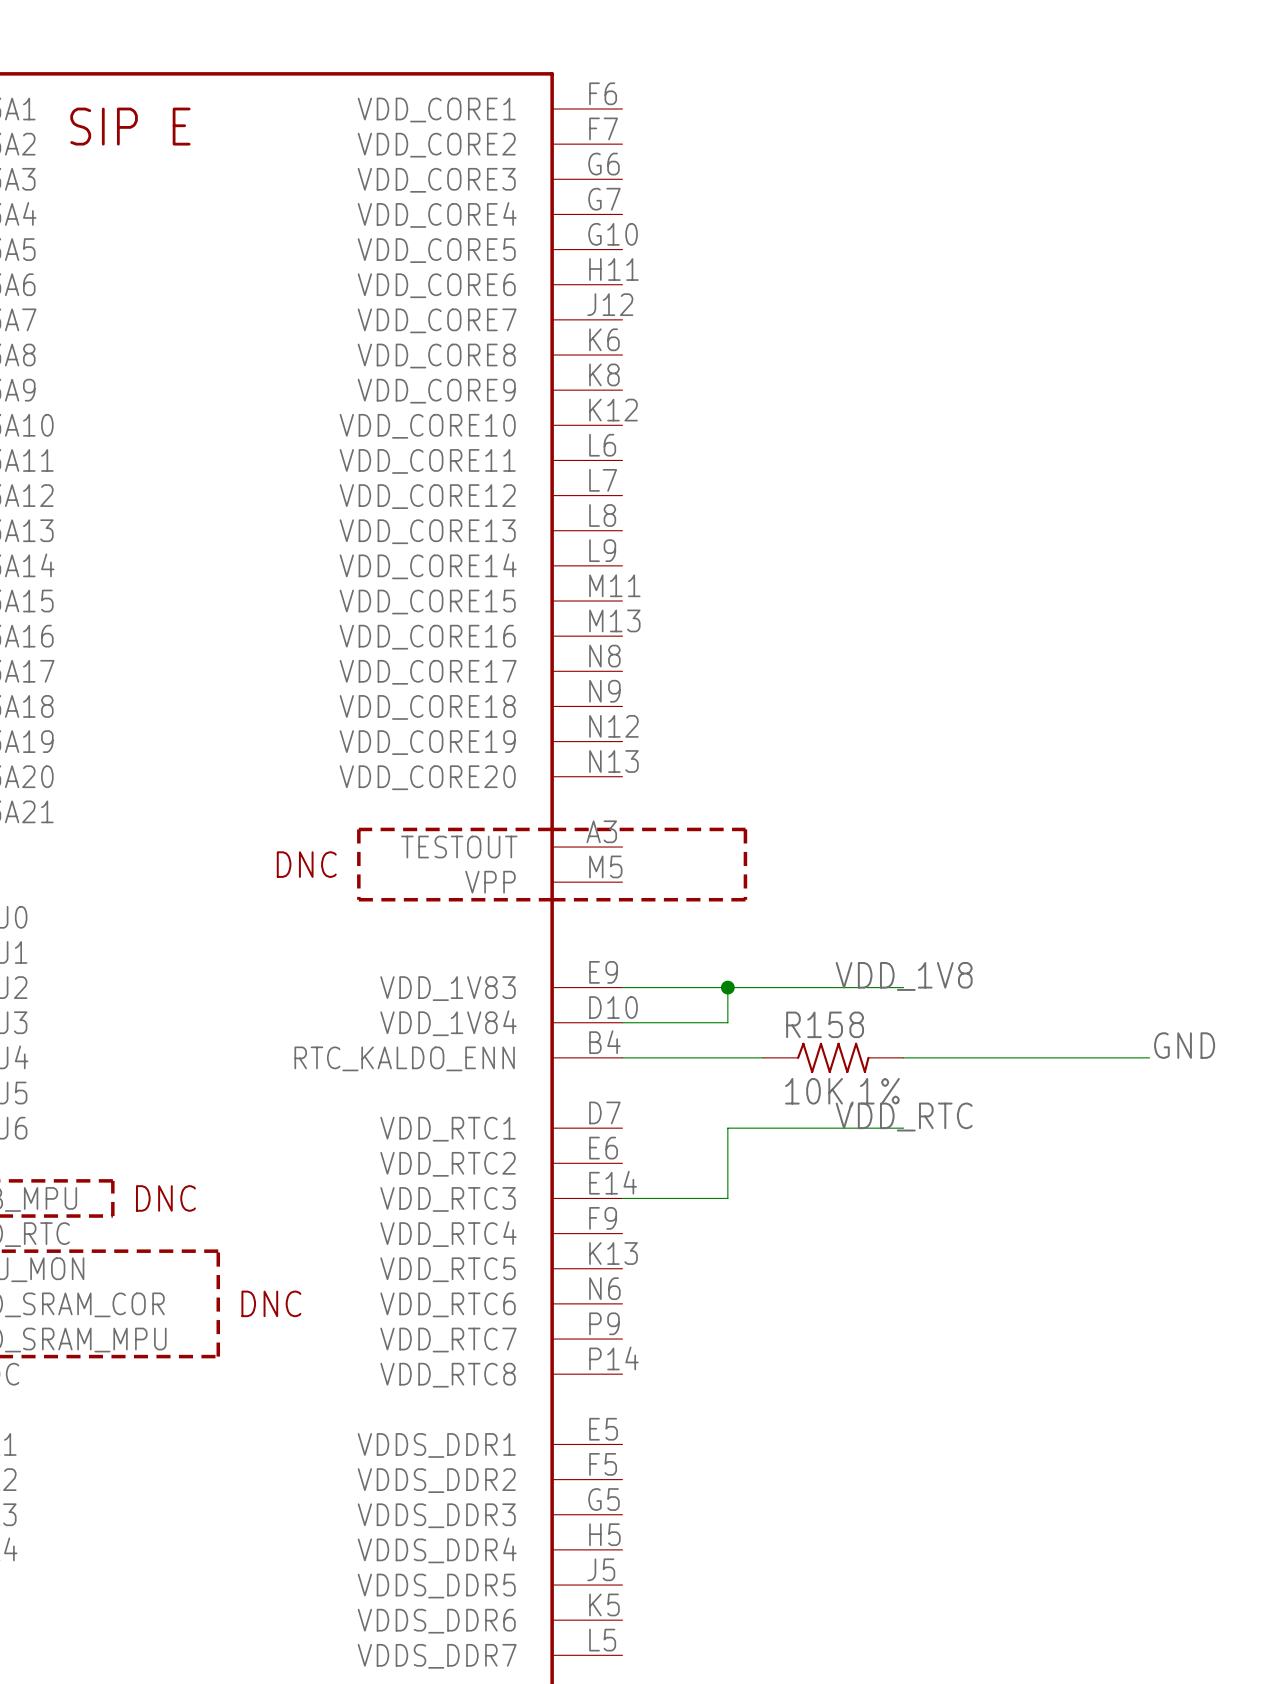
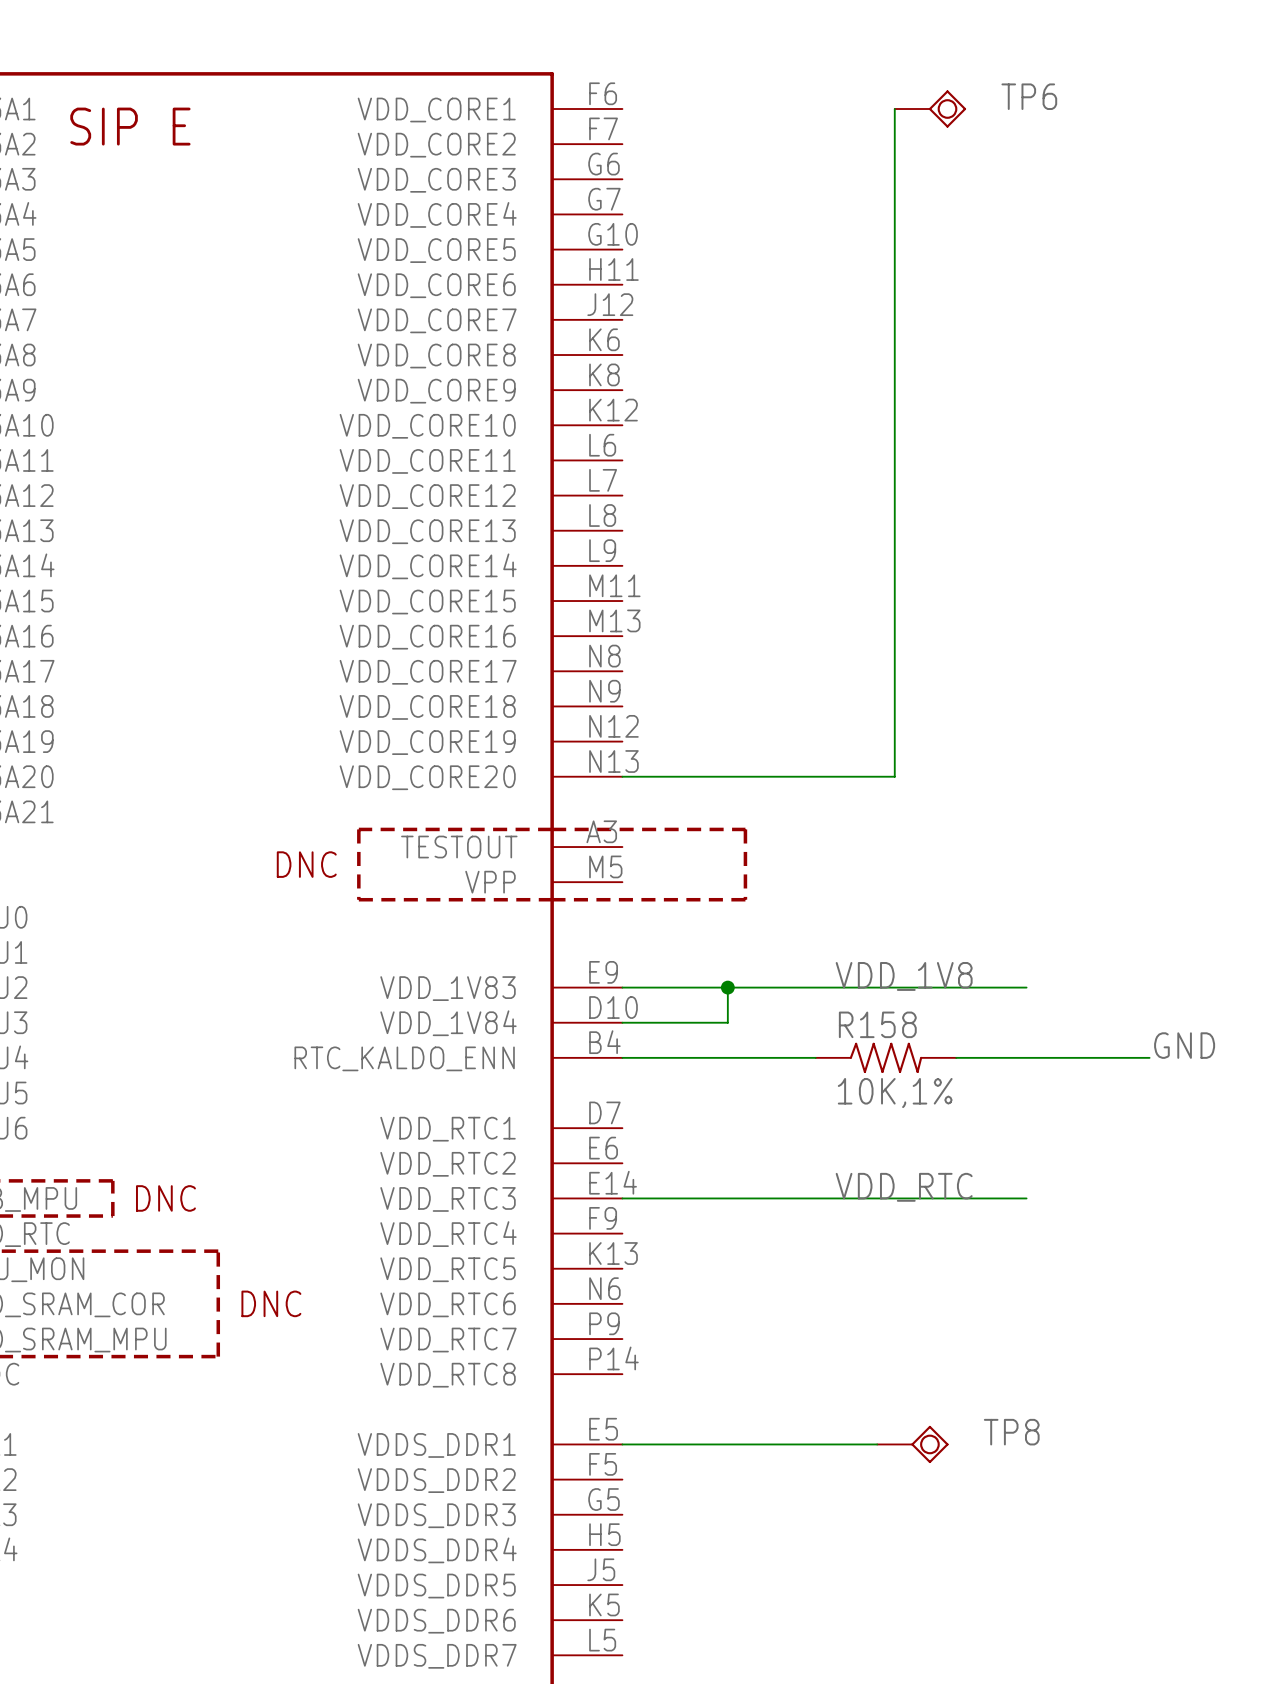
wire: none -> (894, 109) (894, 776) (622, 776)
TP6: none -> (930, 109)
wire: none -> (903, 987) (1026, 987)
R158 position: (833, 1057) -> (885, 1057)
label position: VDD_RTC (904, 1117) -> VDD_RTC (904, 1187)
wire: (903, 1128) (727, 1128) (727, 1198) -> (1026, 1198) (727, 1198)
wire: none -> (622, 1444) (877, 1444)
TP8: none -> (912, 1444)

